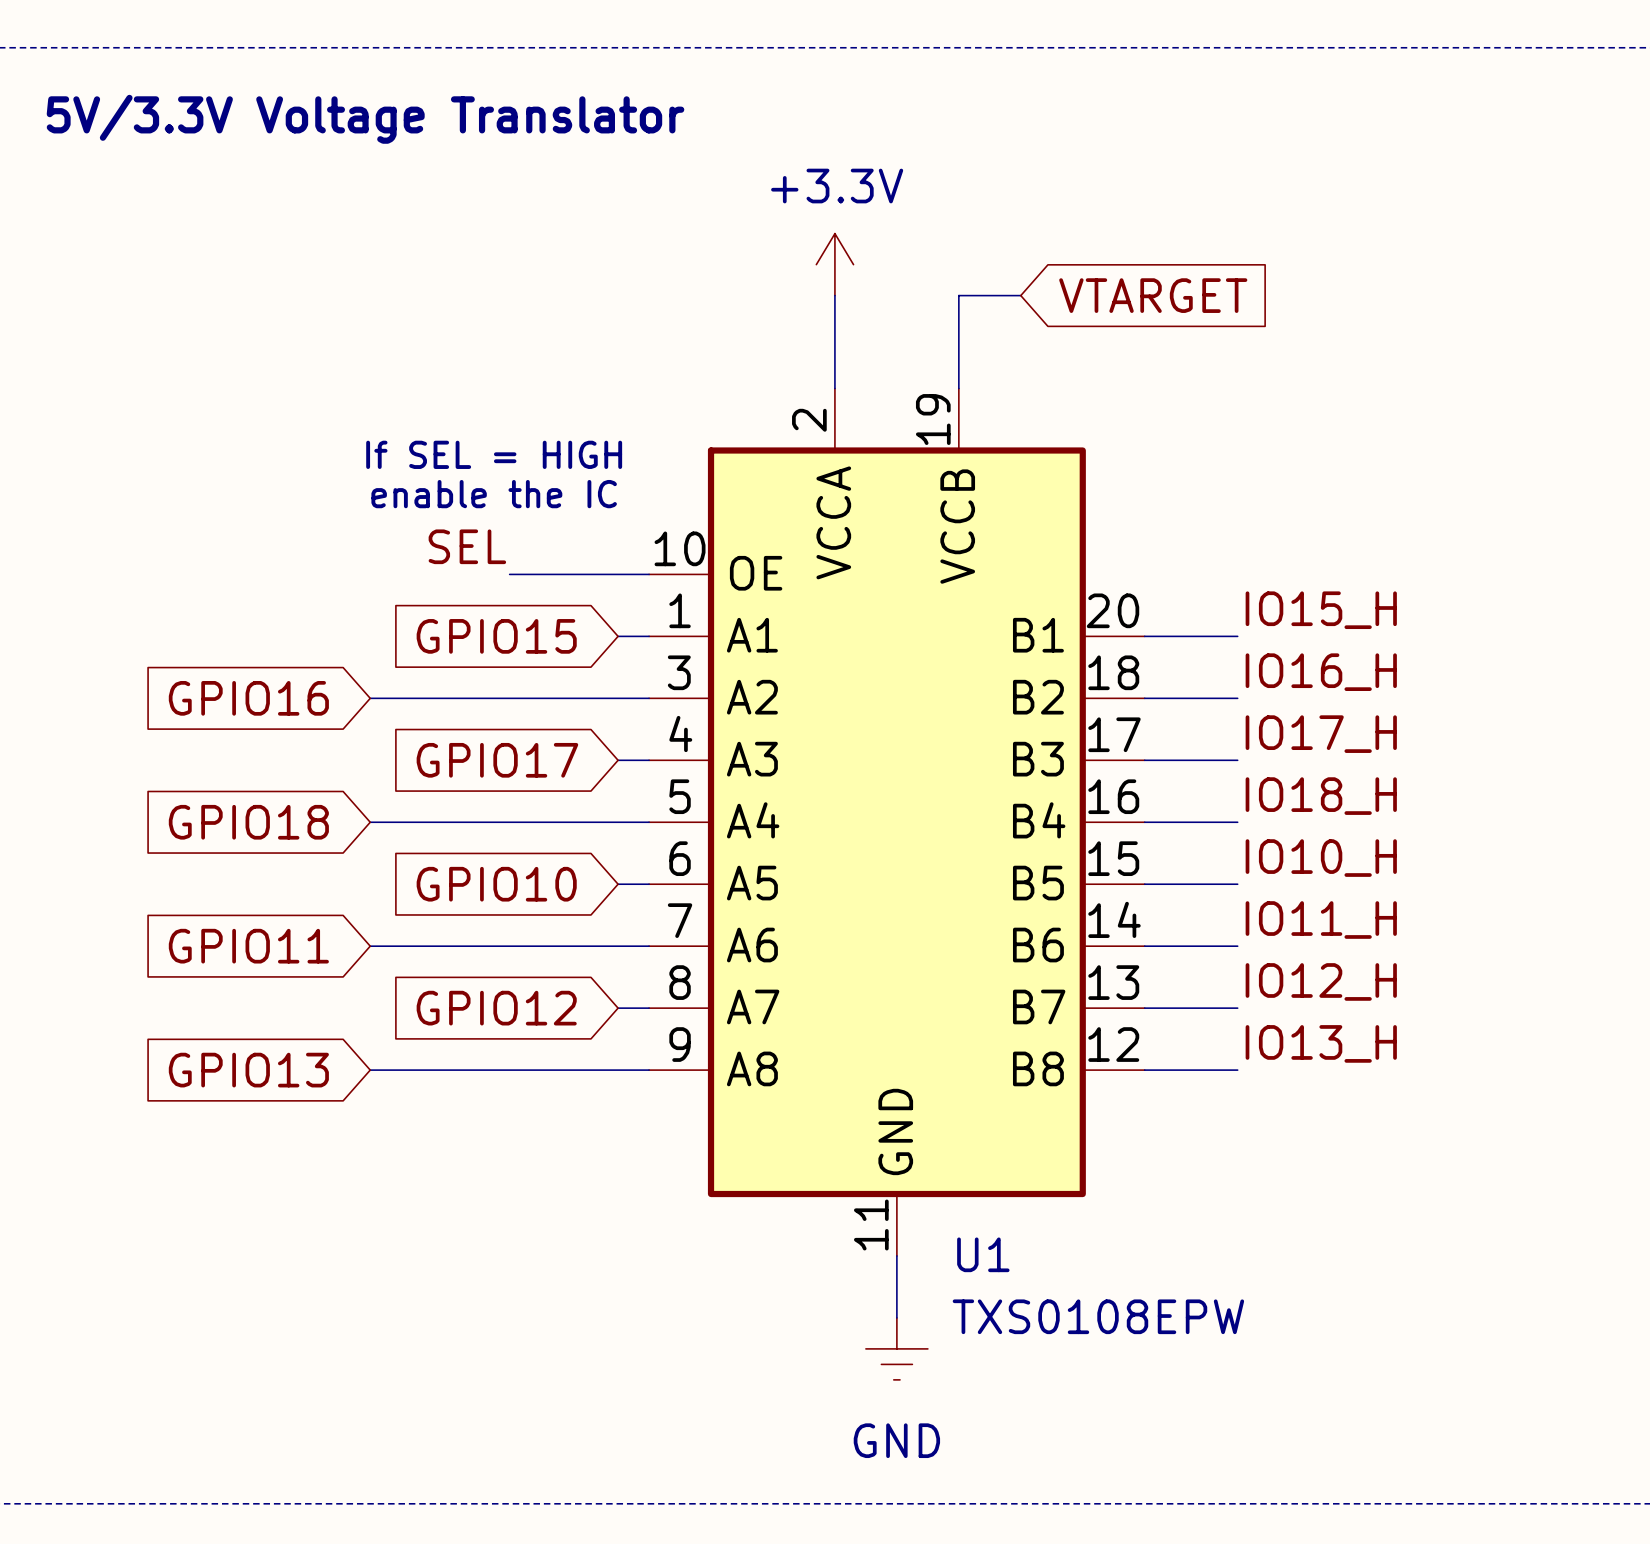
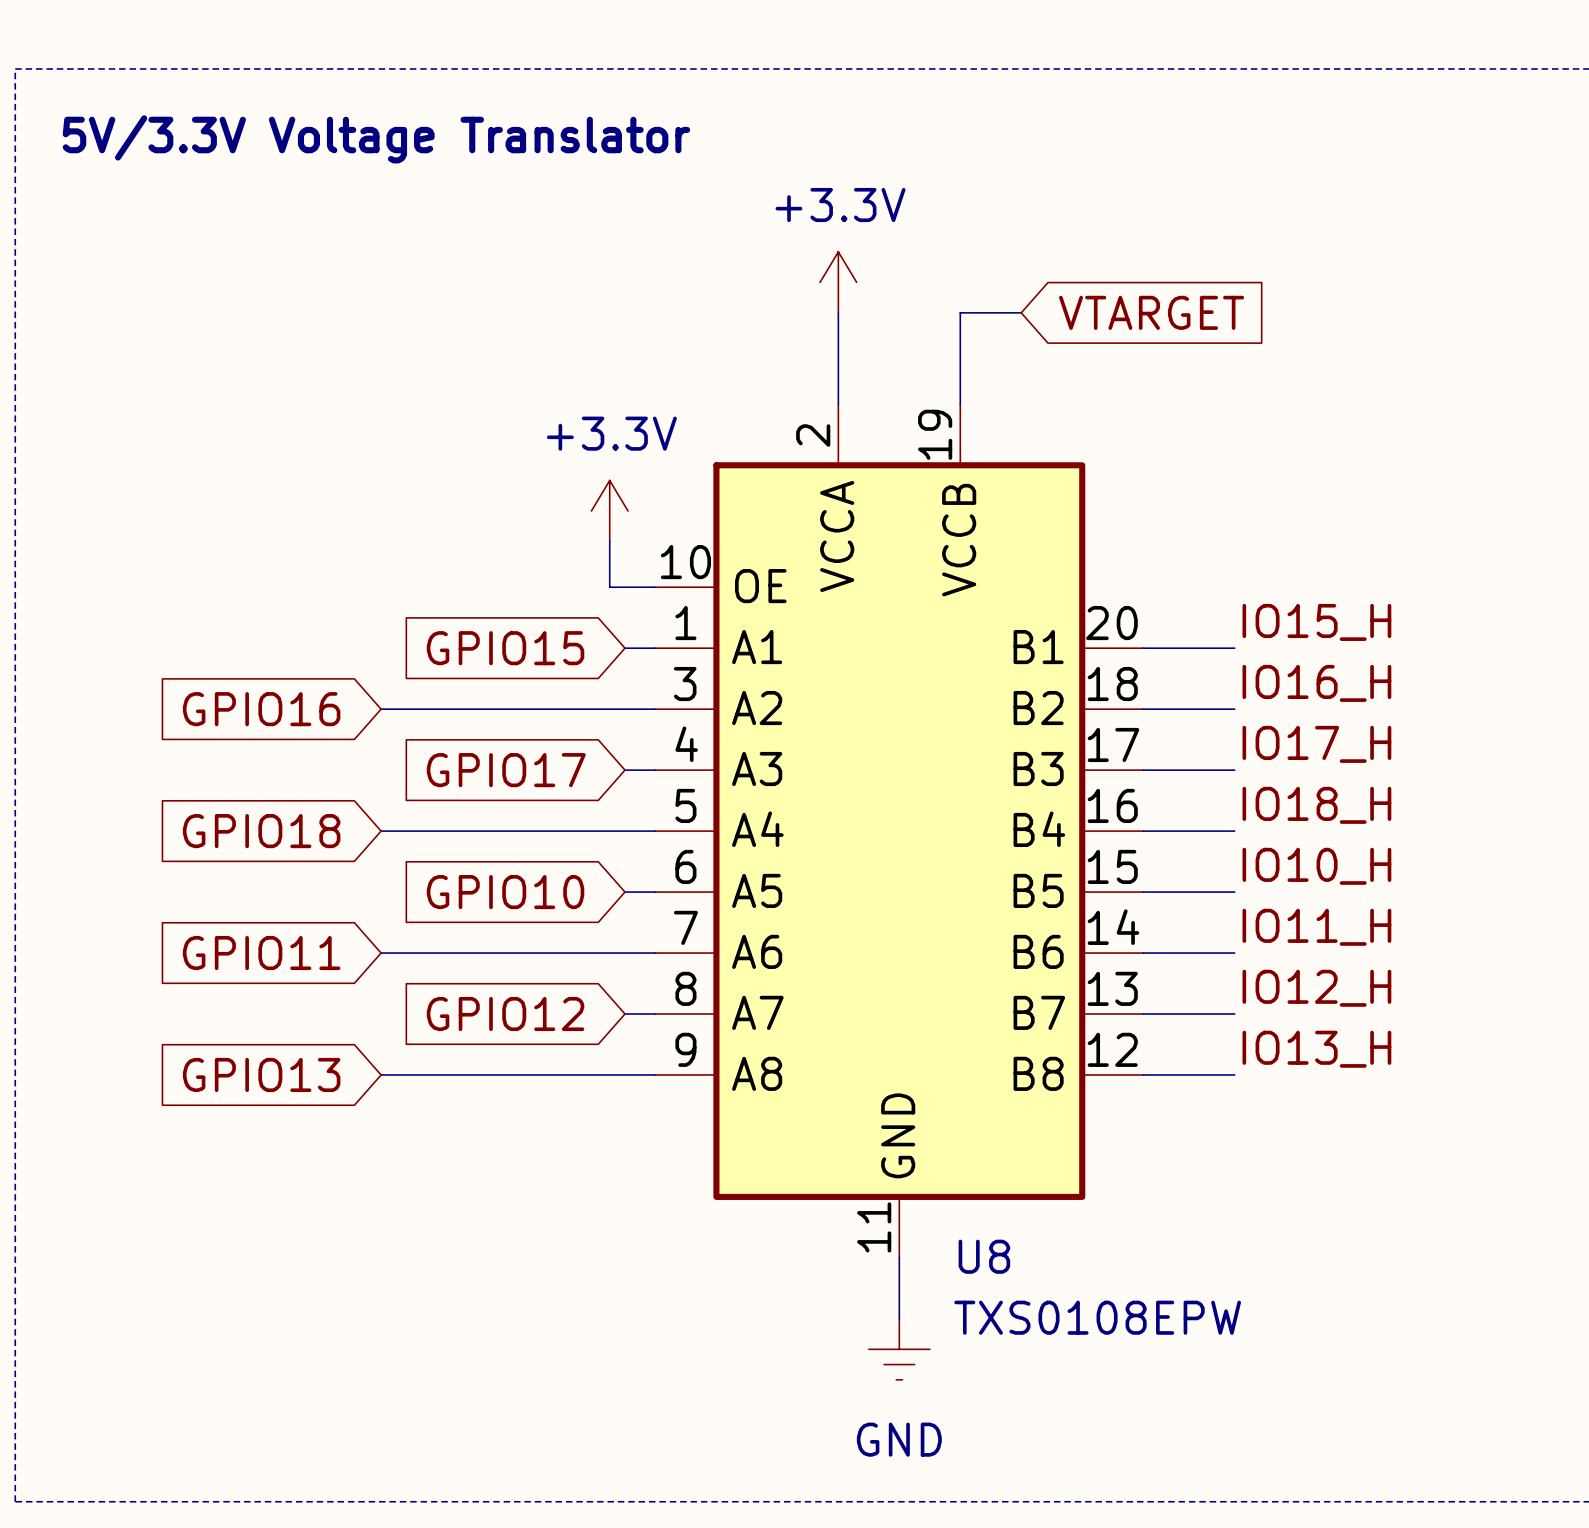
text: If SEL = HIGH (494, 454) -> none
text: enable the IC (494, 494) -> none
power symbol: none -> +3.3V (609, 511)
label: SEL (467, 546) -> none
wire: (509, 574) (602, 574) -> (609, 541) (609, 587)
U1 name: U1 (983, 1254) -> U8 (984, 1256)

